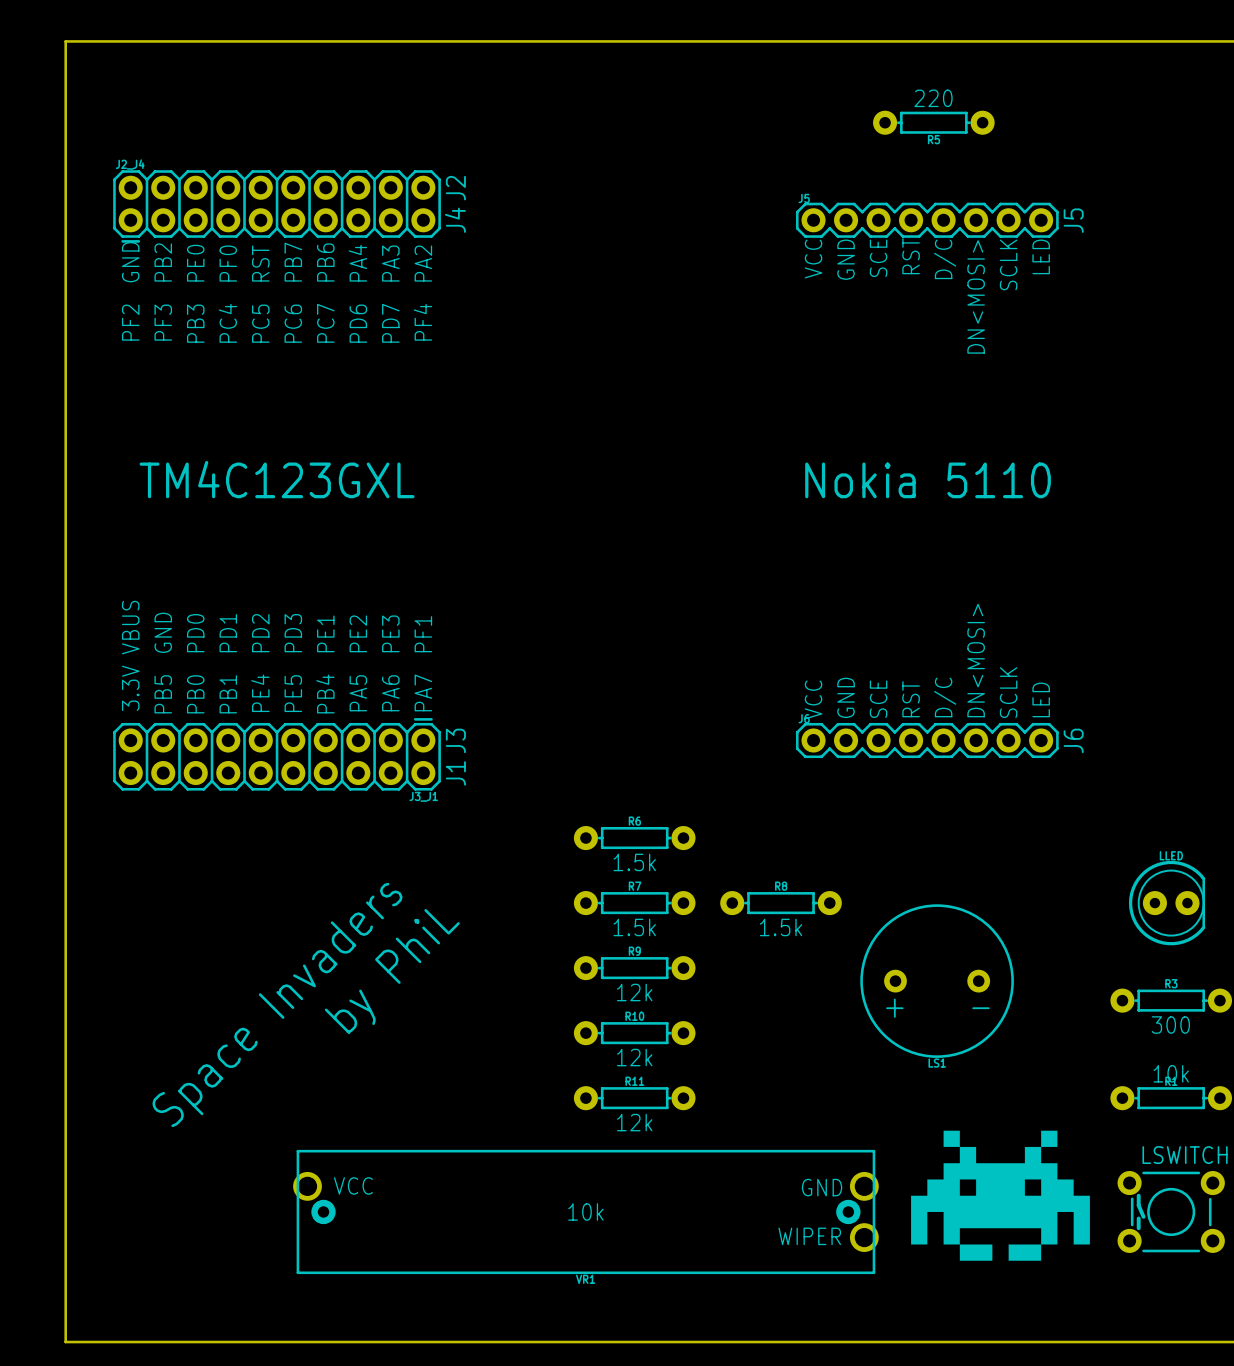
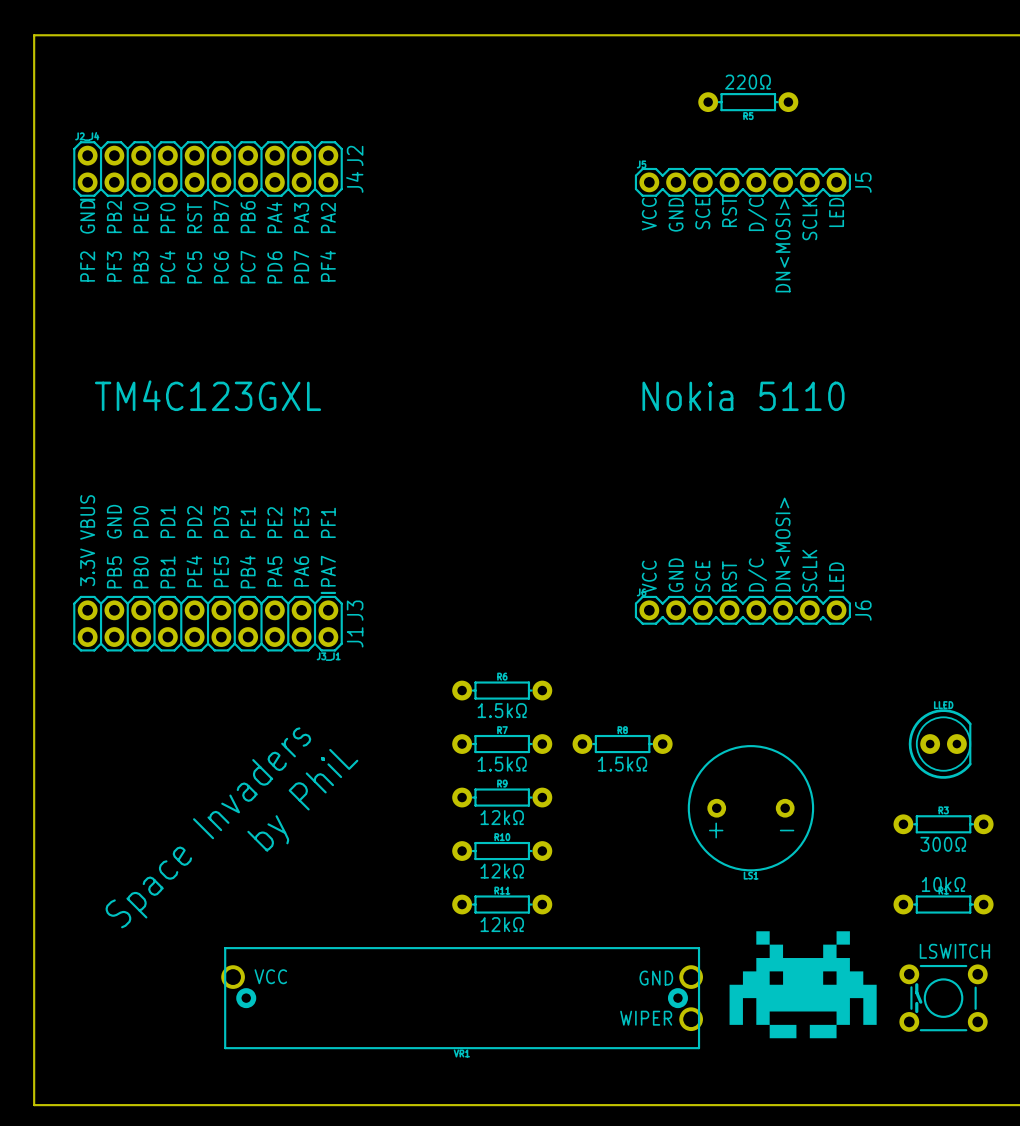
text: 220 (933, 98) -> 220Ω (748, 82)
text: 1.5k (634, 862) -> 1.5kΩ (502, 710)
text: 1.5k (634, 927) -> 1.5kΩ (502, 764)
text: 1.5k (781, 927) -> 1.5kΩ (622, 764)
text: 12k (634, 992) -> 12kΩ (502, 817)
text: 300 (1170, 1025) -> 300Ω (943, 844)
text: 12k (634, 1057) -> 12kΩ (502, 871)
text: 10k (1171, 1073) -> 10kΩ (943, 884)
text: 12k (634, 1122) -> 12kΩ (502, 924)
text: 10k (585, 1211) -> none

